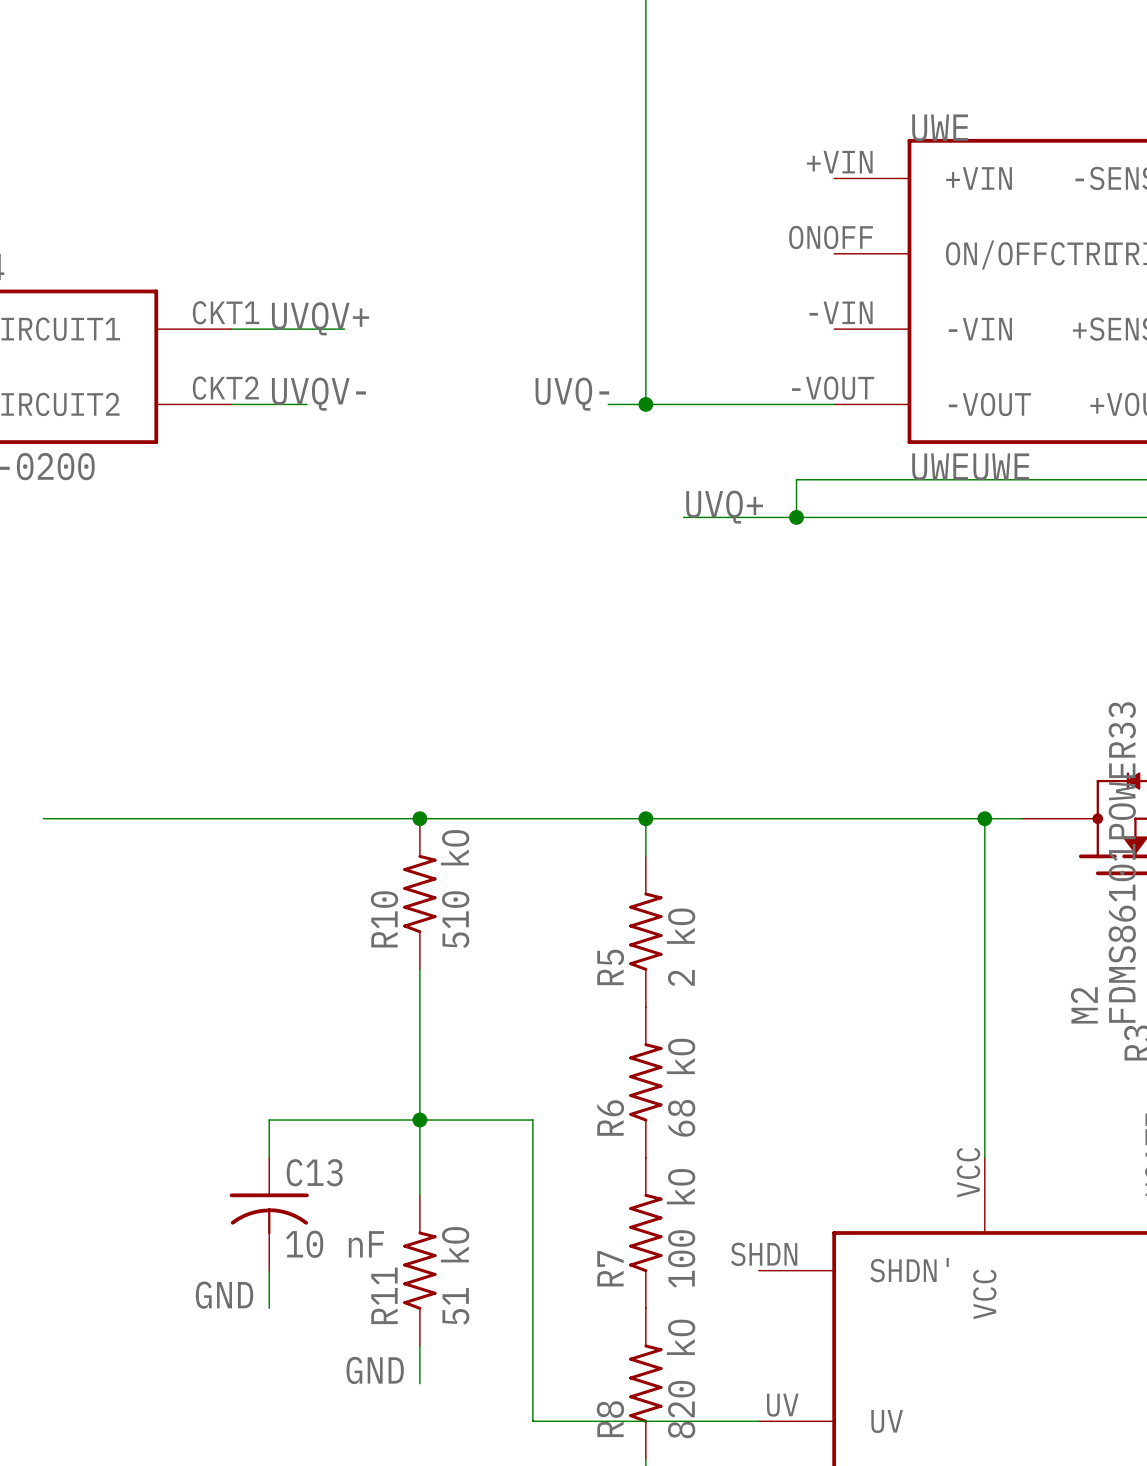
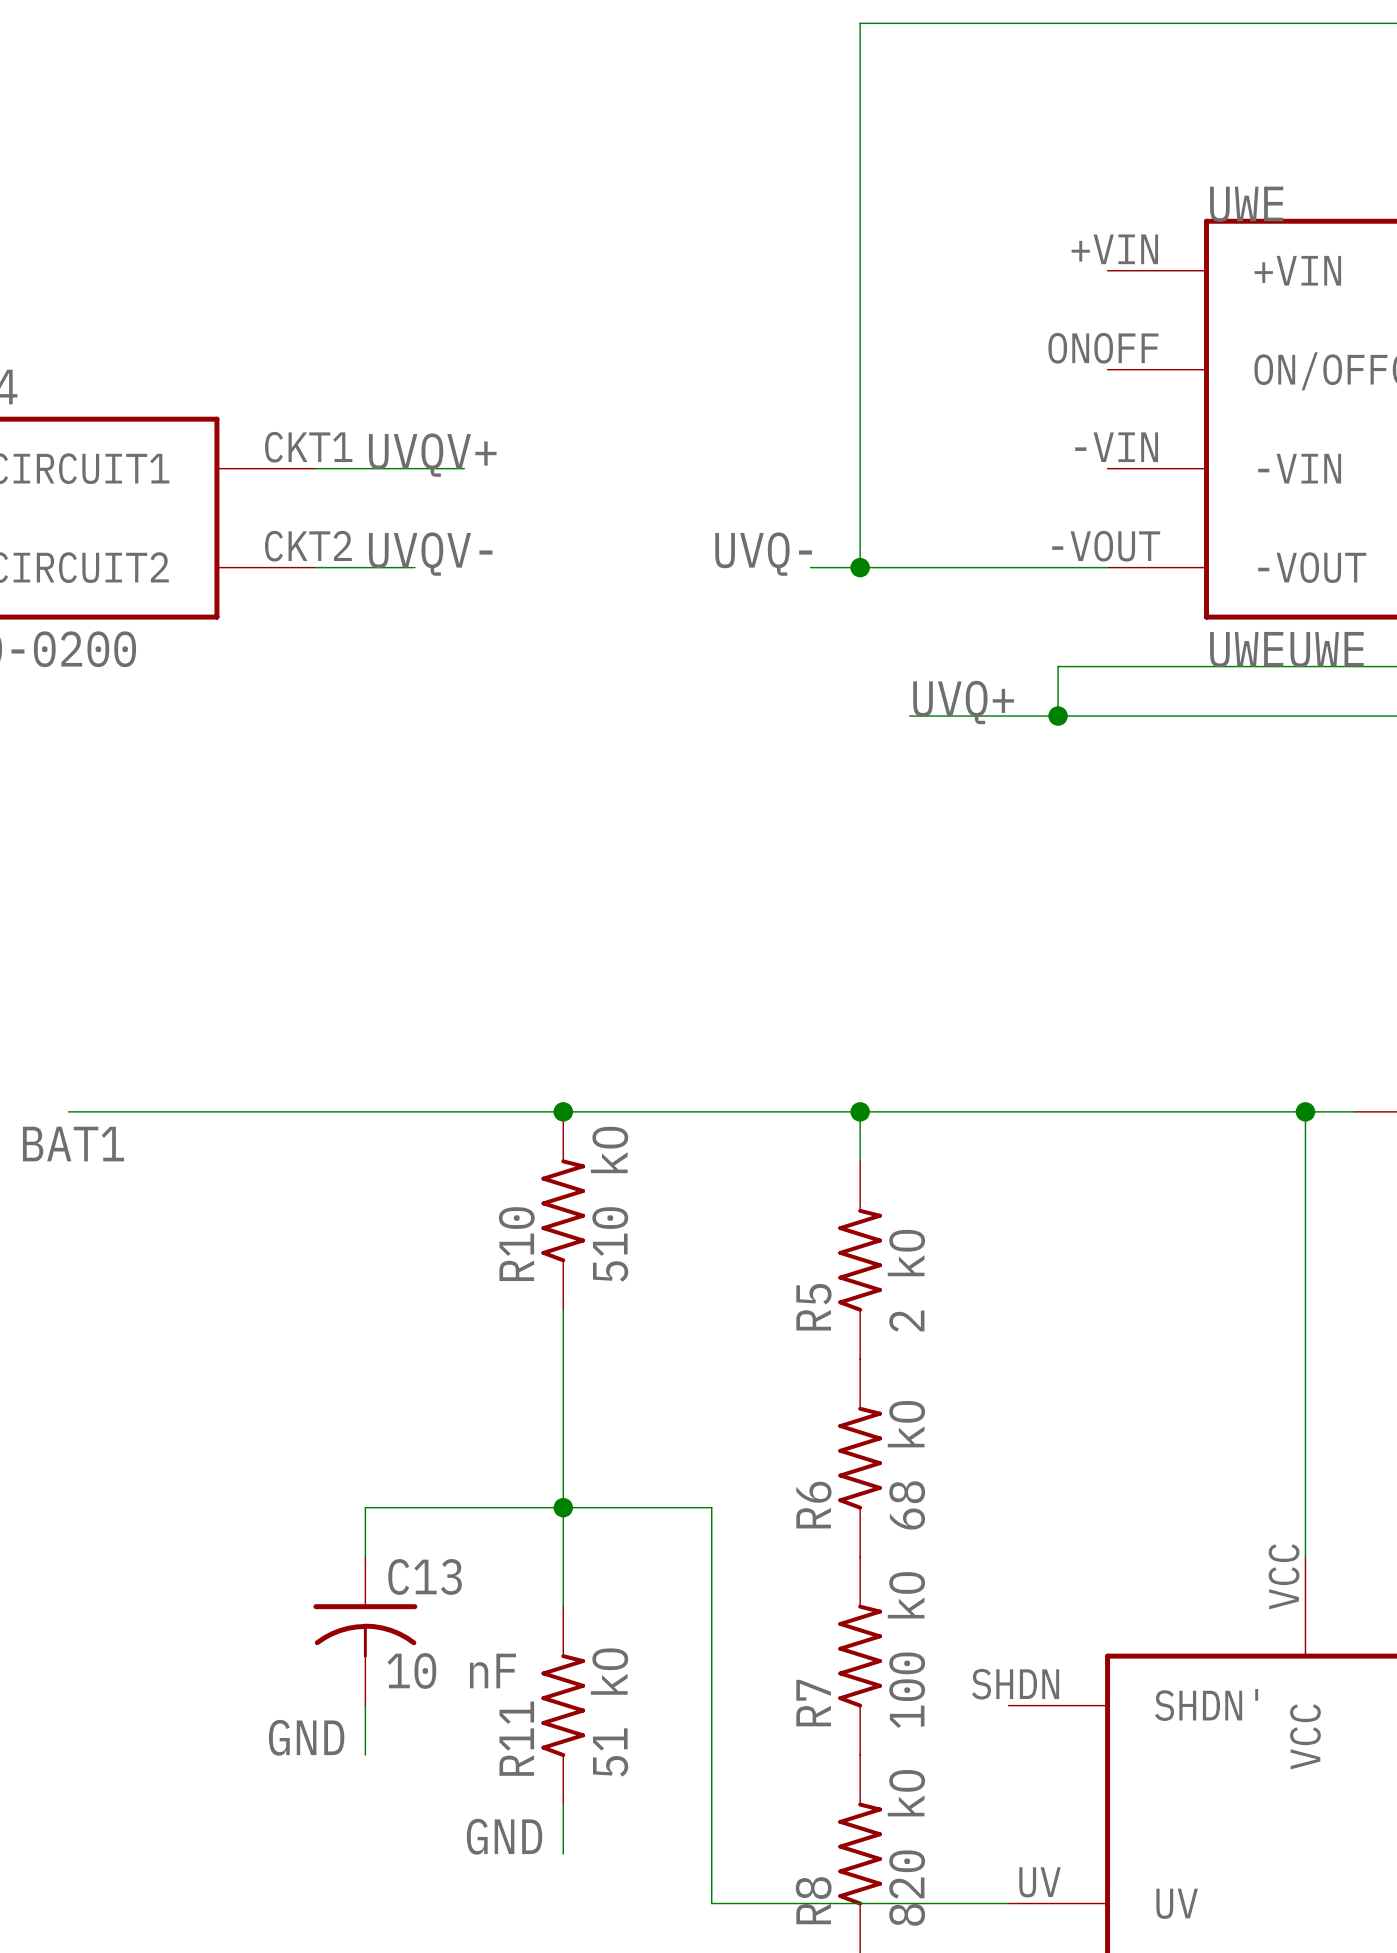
label: none -> BAT1 (73, 1144)

